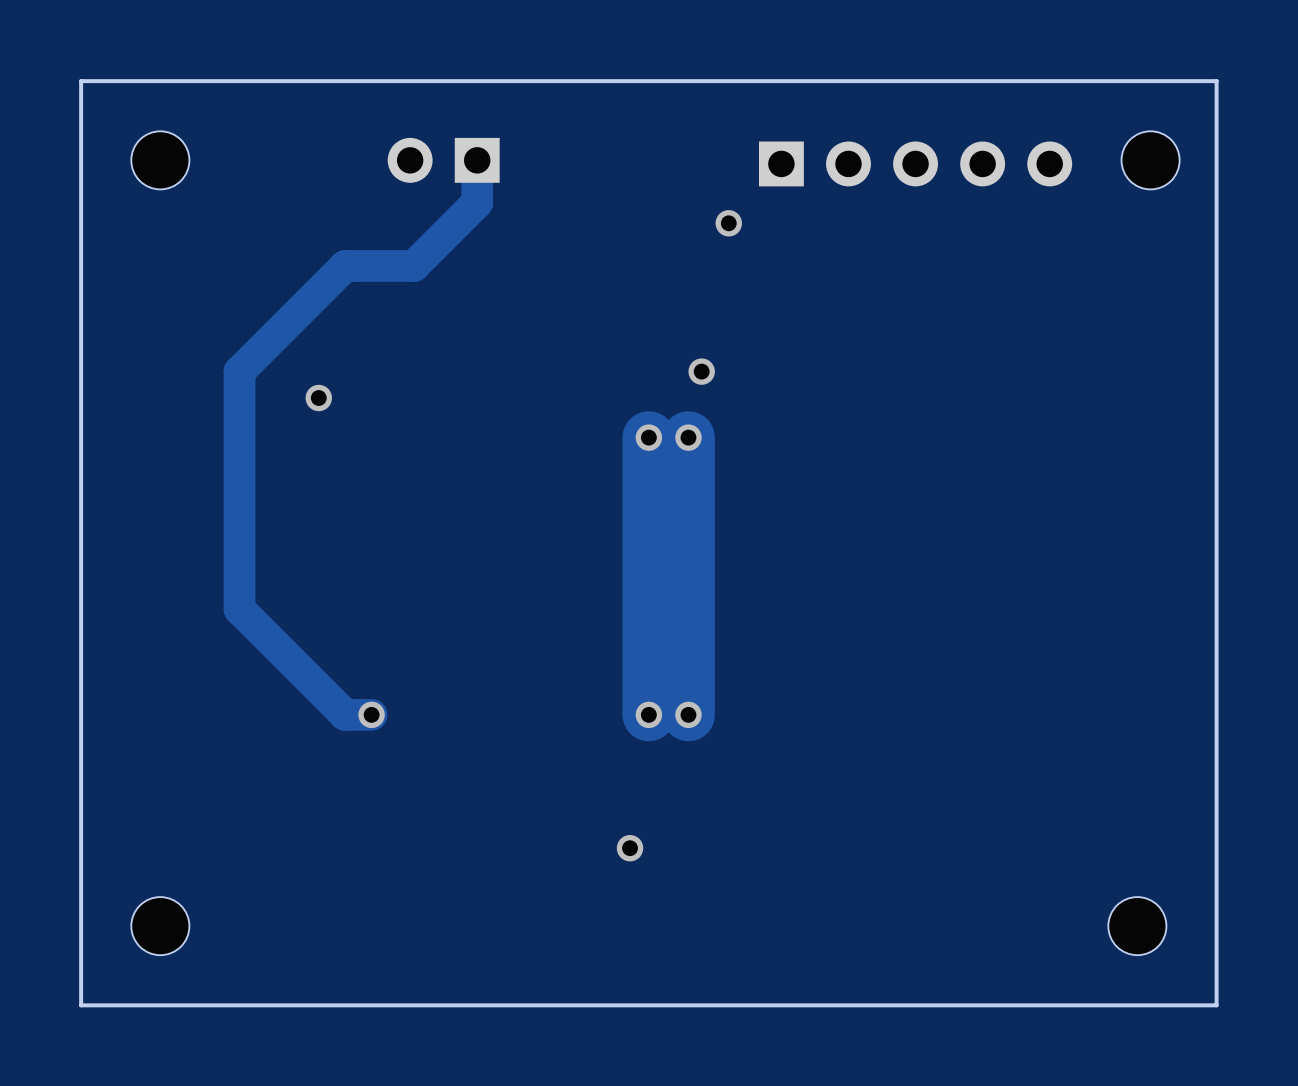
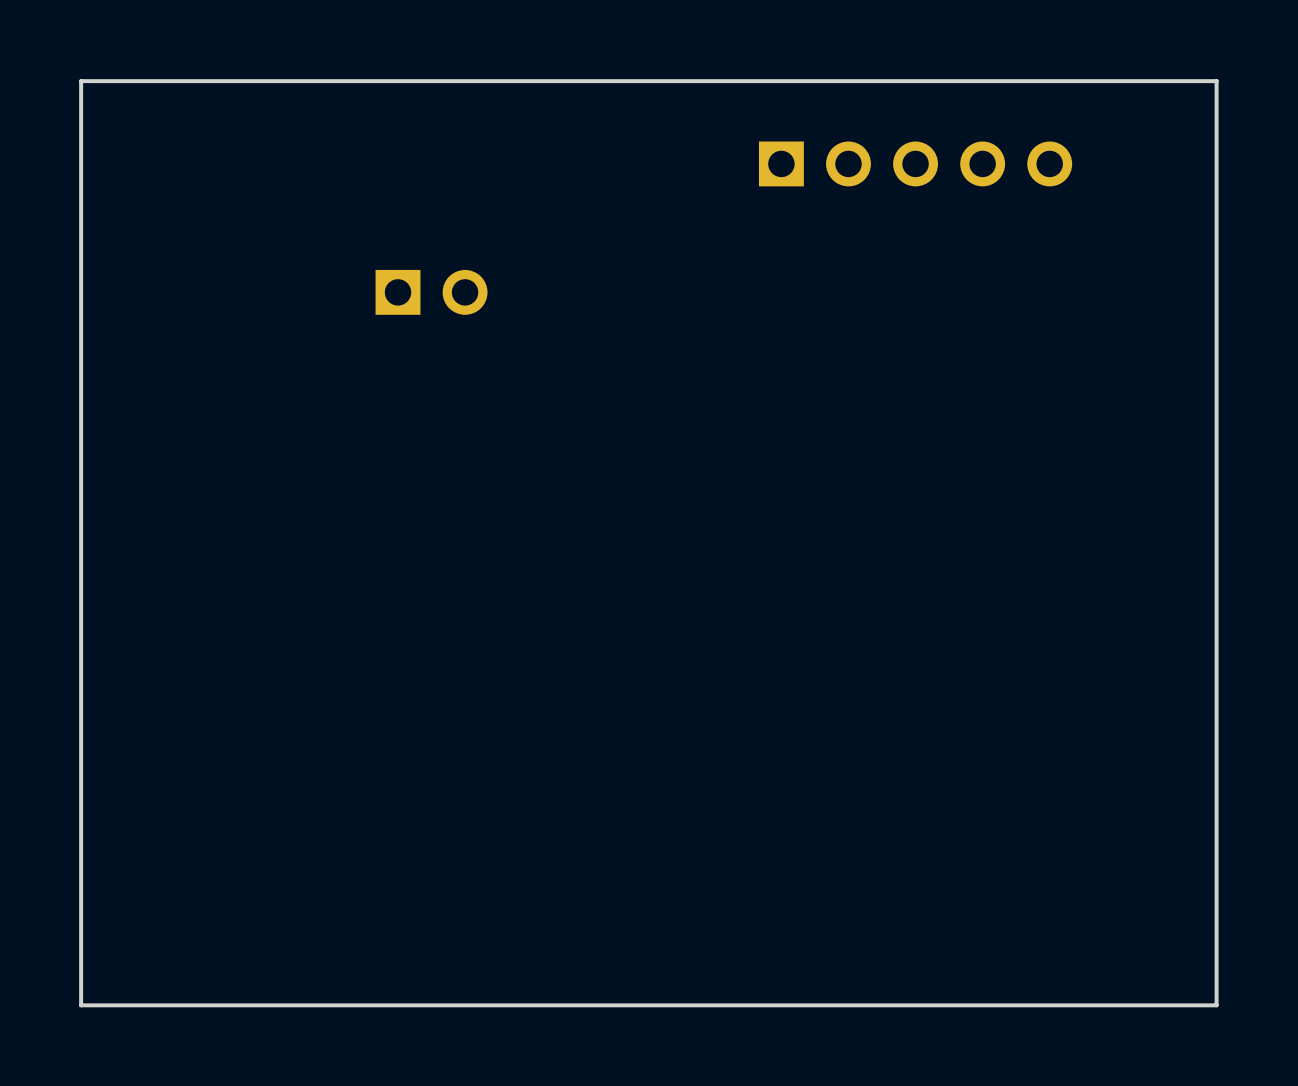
part: (160, 160) -> none
part rotation: 0° (443, 160) -> 180° (431, 292)
part position: (443, 160) -> (431, 292)
track: (477, 160) (477, 202) (413, 265) (345, 265) (239, 371) (239, 609) (345, 714) (371, 714) -> none
part: (1150, 160) -> none
via: (728, 223) -> none
via: (701, 371) -> none
via: (318, 398) -> none
track: (648, 437) (648, 714) -> none
via: (648, 437) -> none
track: (688, 437) (688, 714) -> none
via: (688, 437) -> none
via: (371, 714) -> none
via: (648, 714) -> none
via: (688, 714) -> none
via: (630, 848) -> none
part: (160, 926) -> none
part: (1137, 926) -> none

